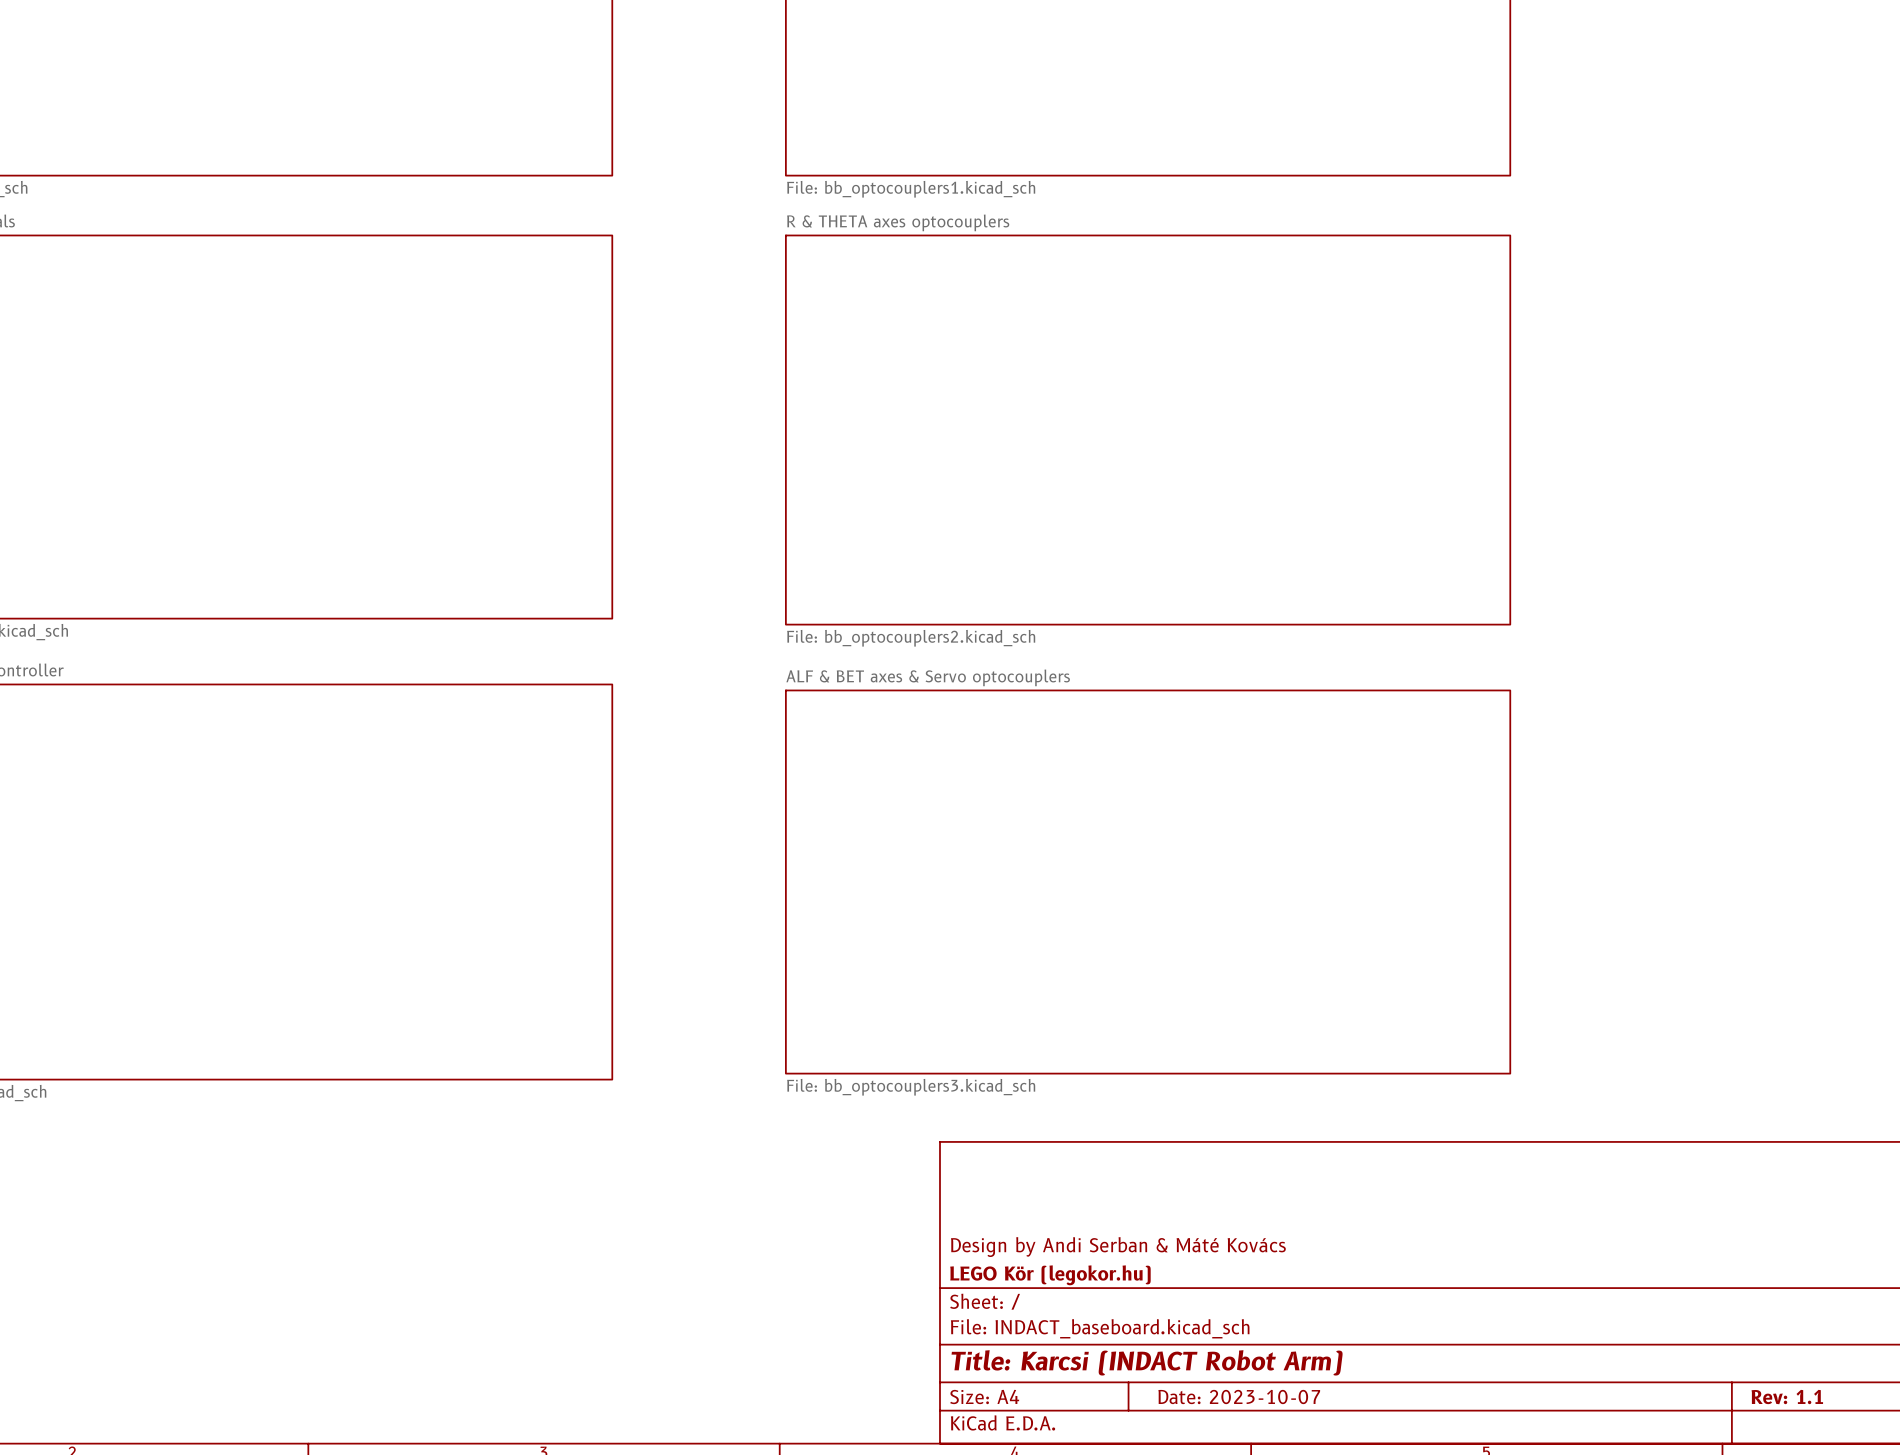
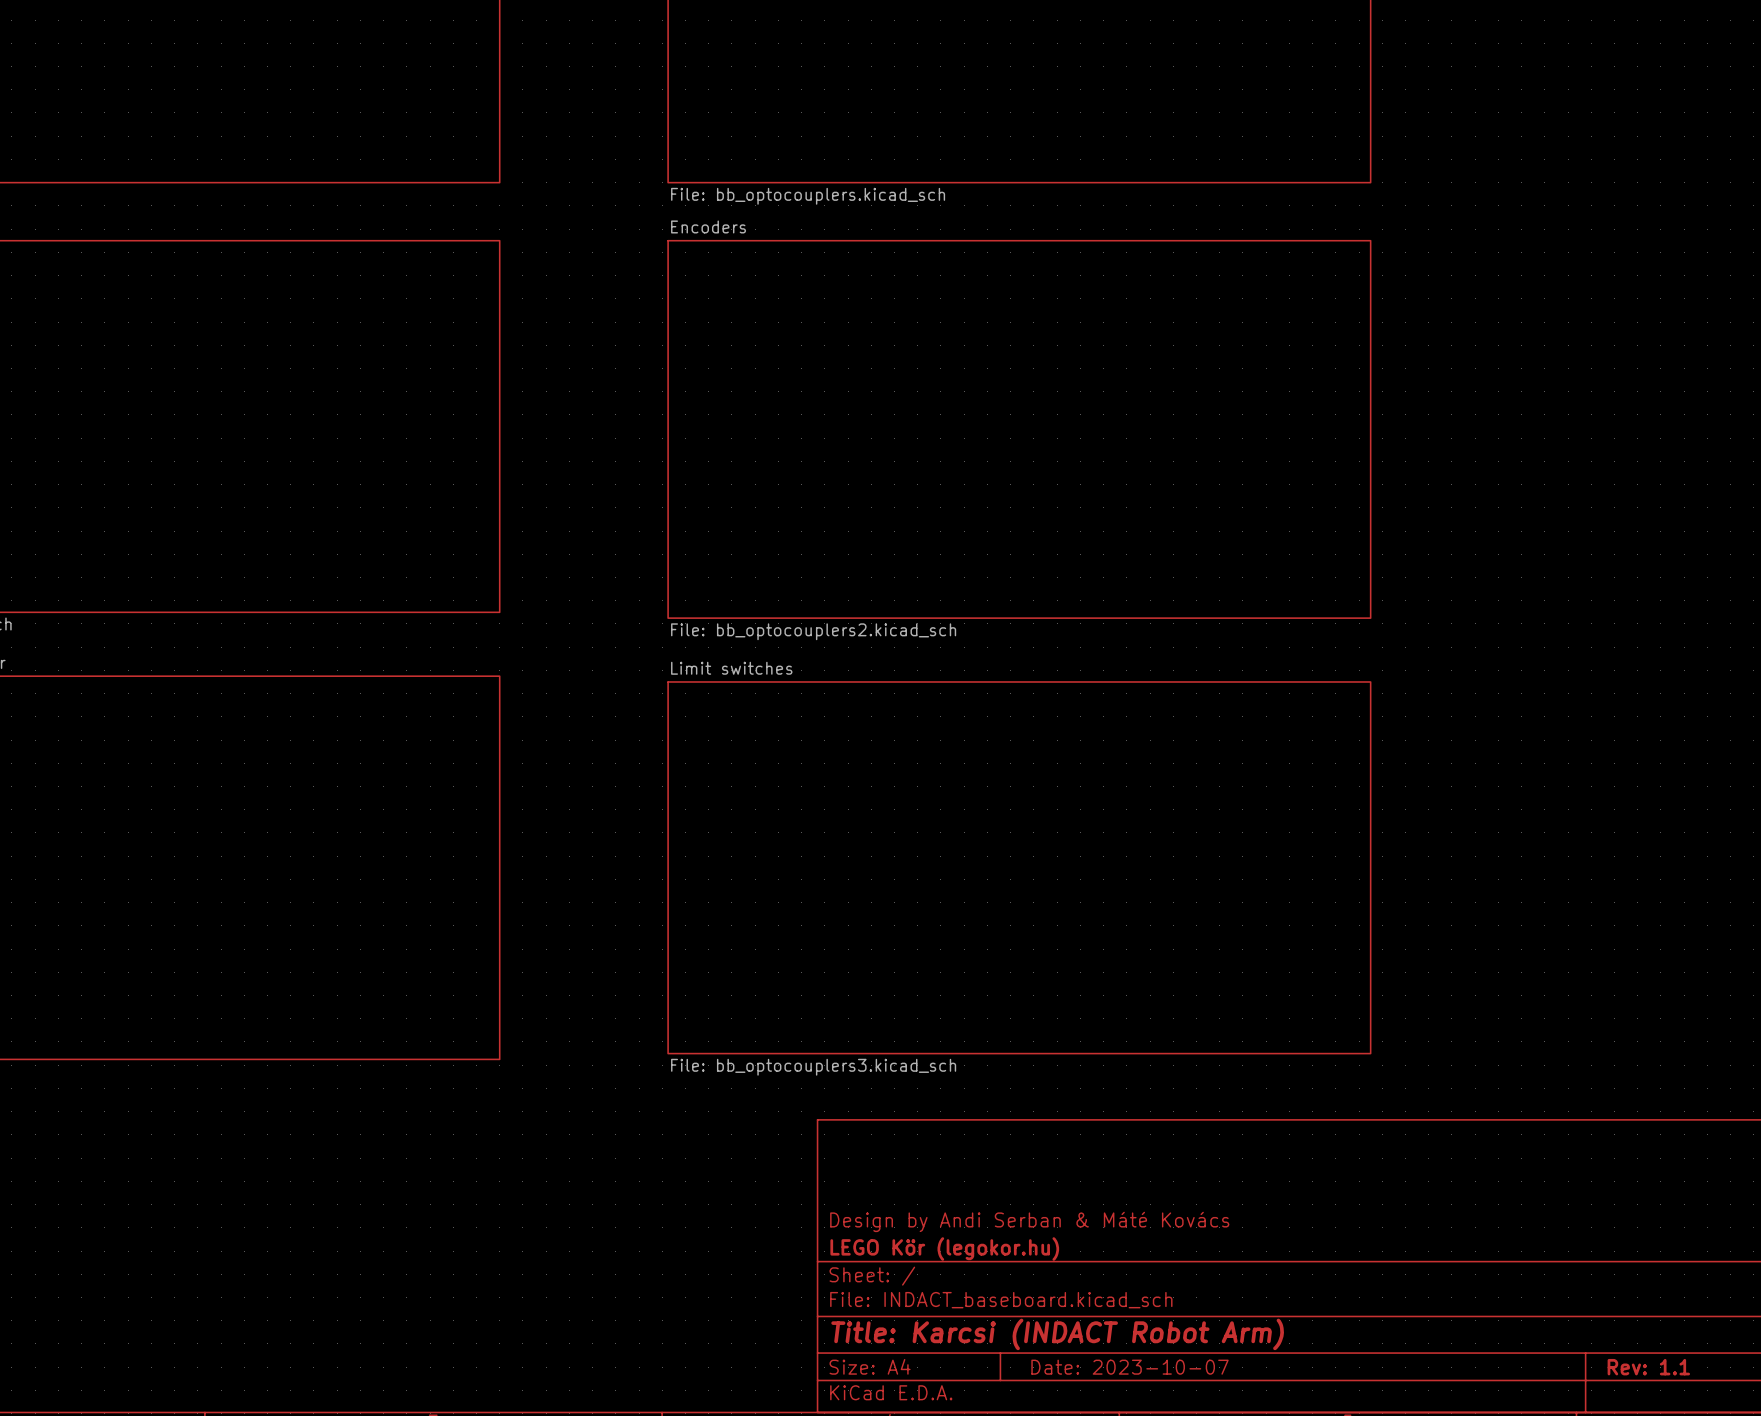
sheet value: File: bb_optocouplers1.kicad_sch (911, 189) -> File: bb_optocouplers.kicad_sch (808, 196)
sheet R & THETA axes optocouplers name: R & THETA axes optocouplers (898, 222) -> Encoders (708, 226)
sheet ALF & BET axes & Servo optocouplers name: ALF & BET axes & Servo optocouplers (928, 677) -> Limit switches (731, 668)

